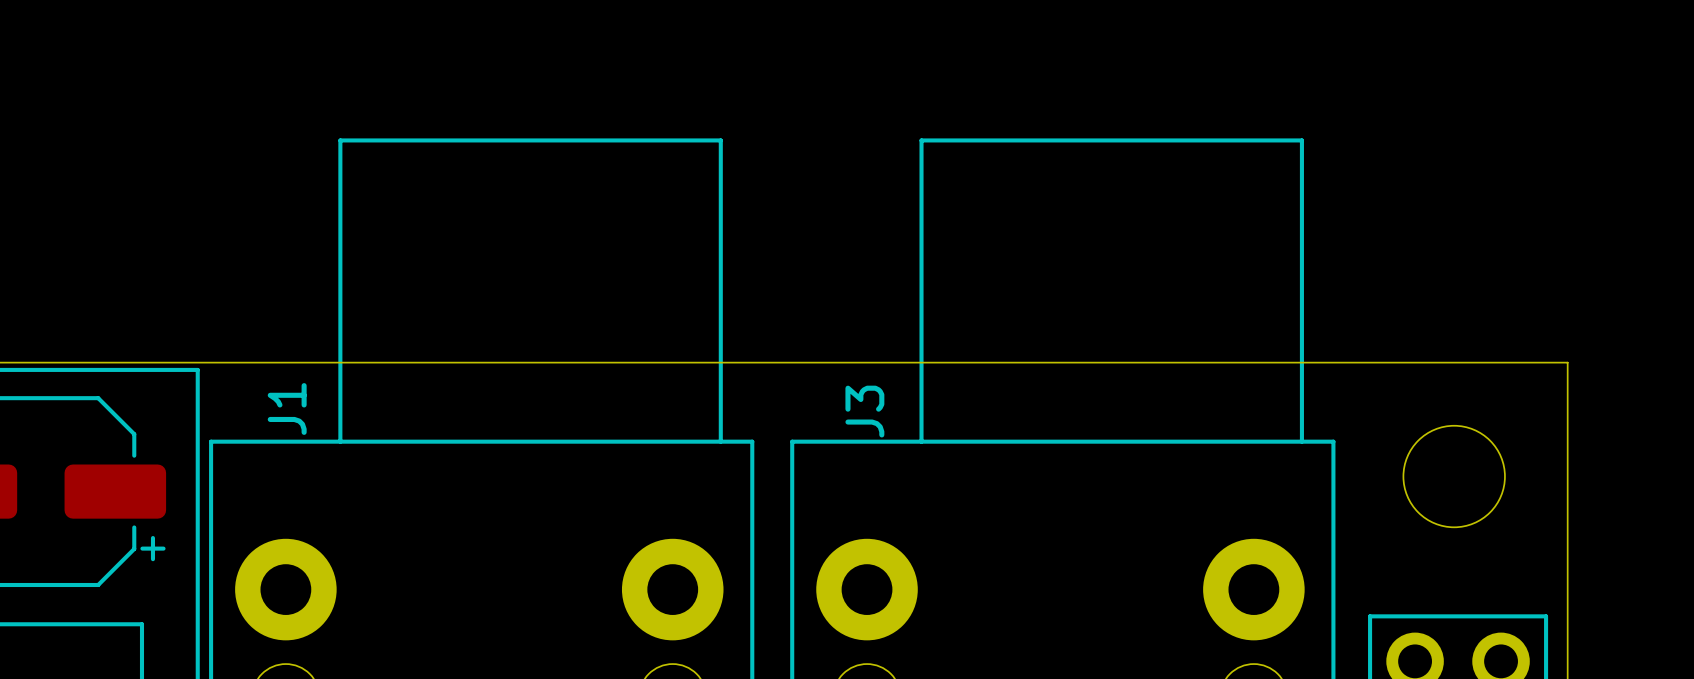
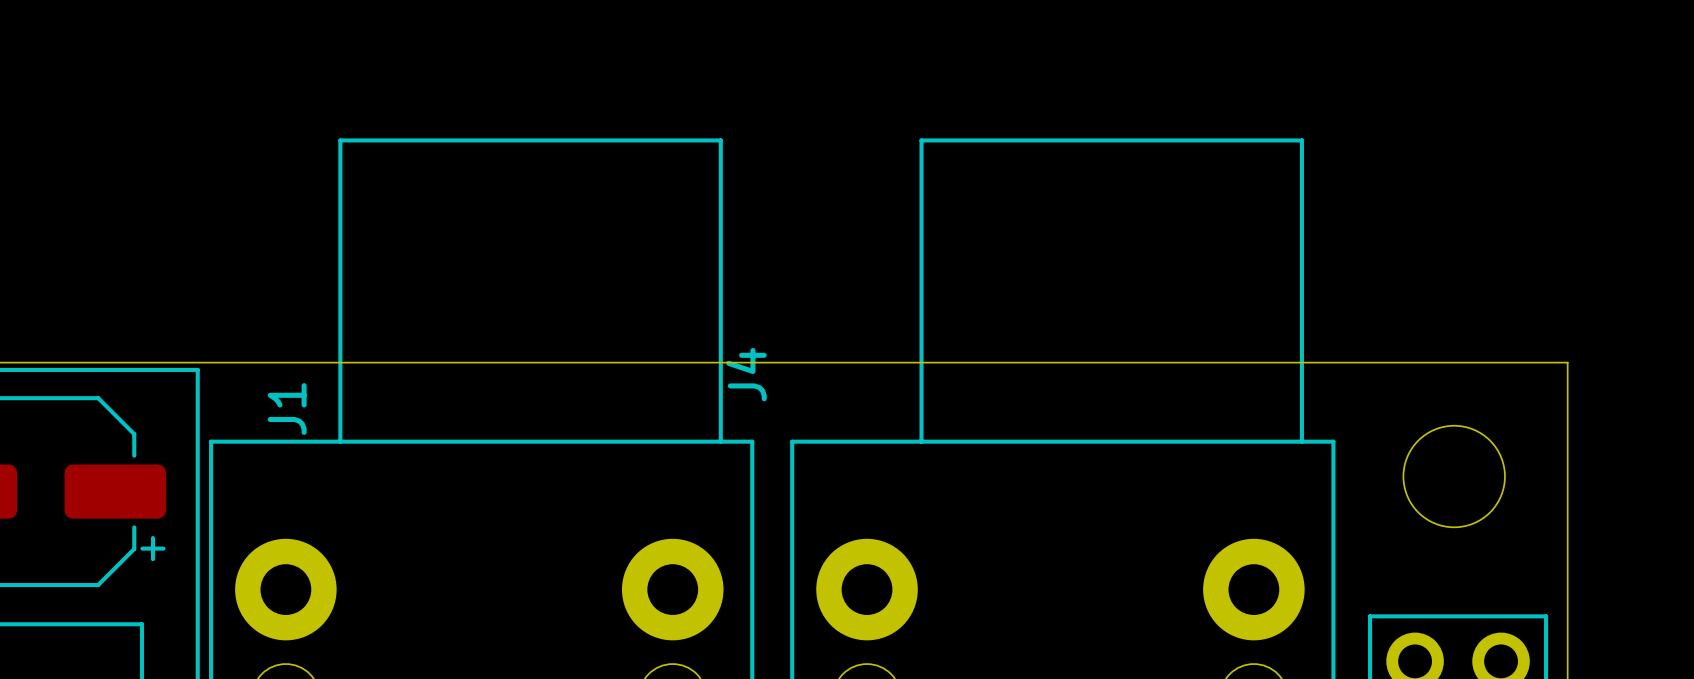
J3 name: J3 (864, 411) -> J4 (746, 374)

